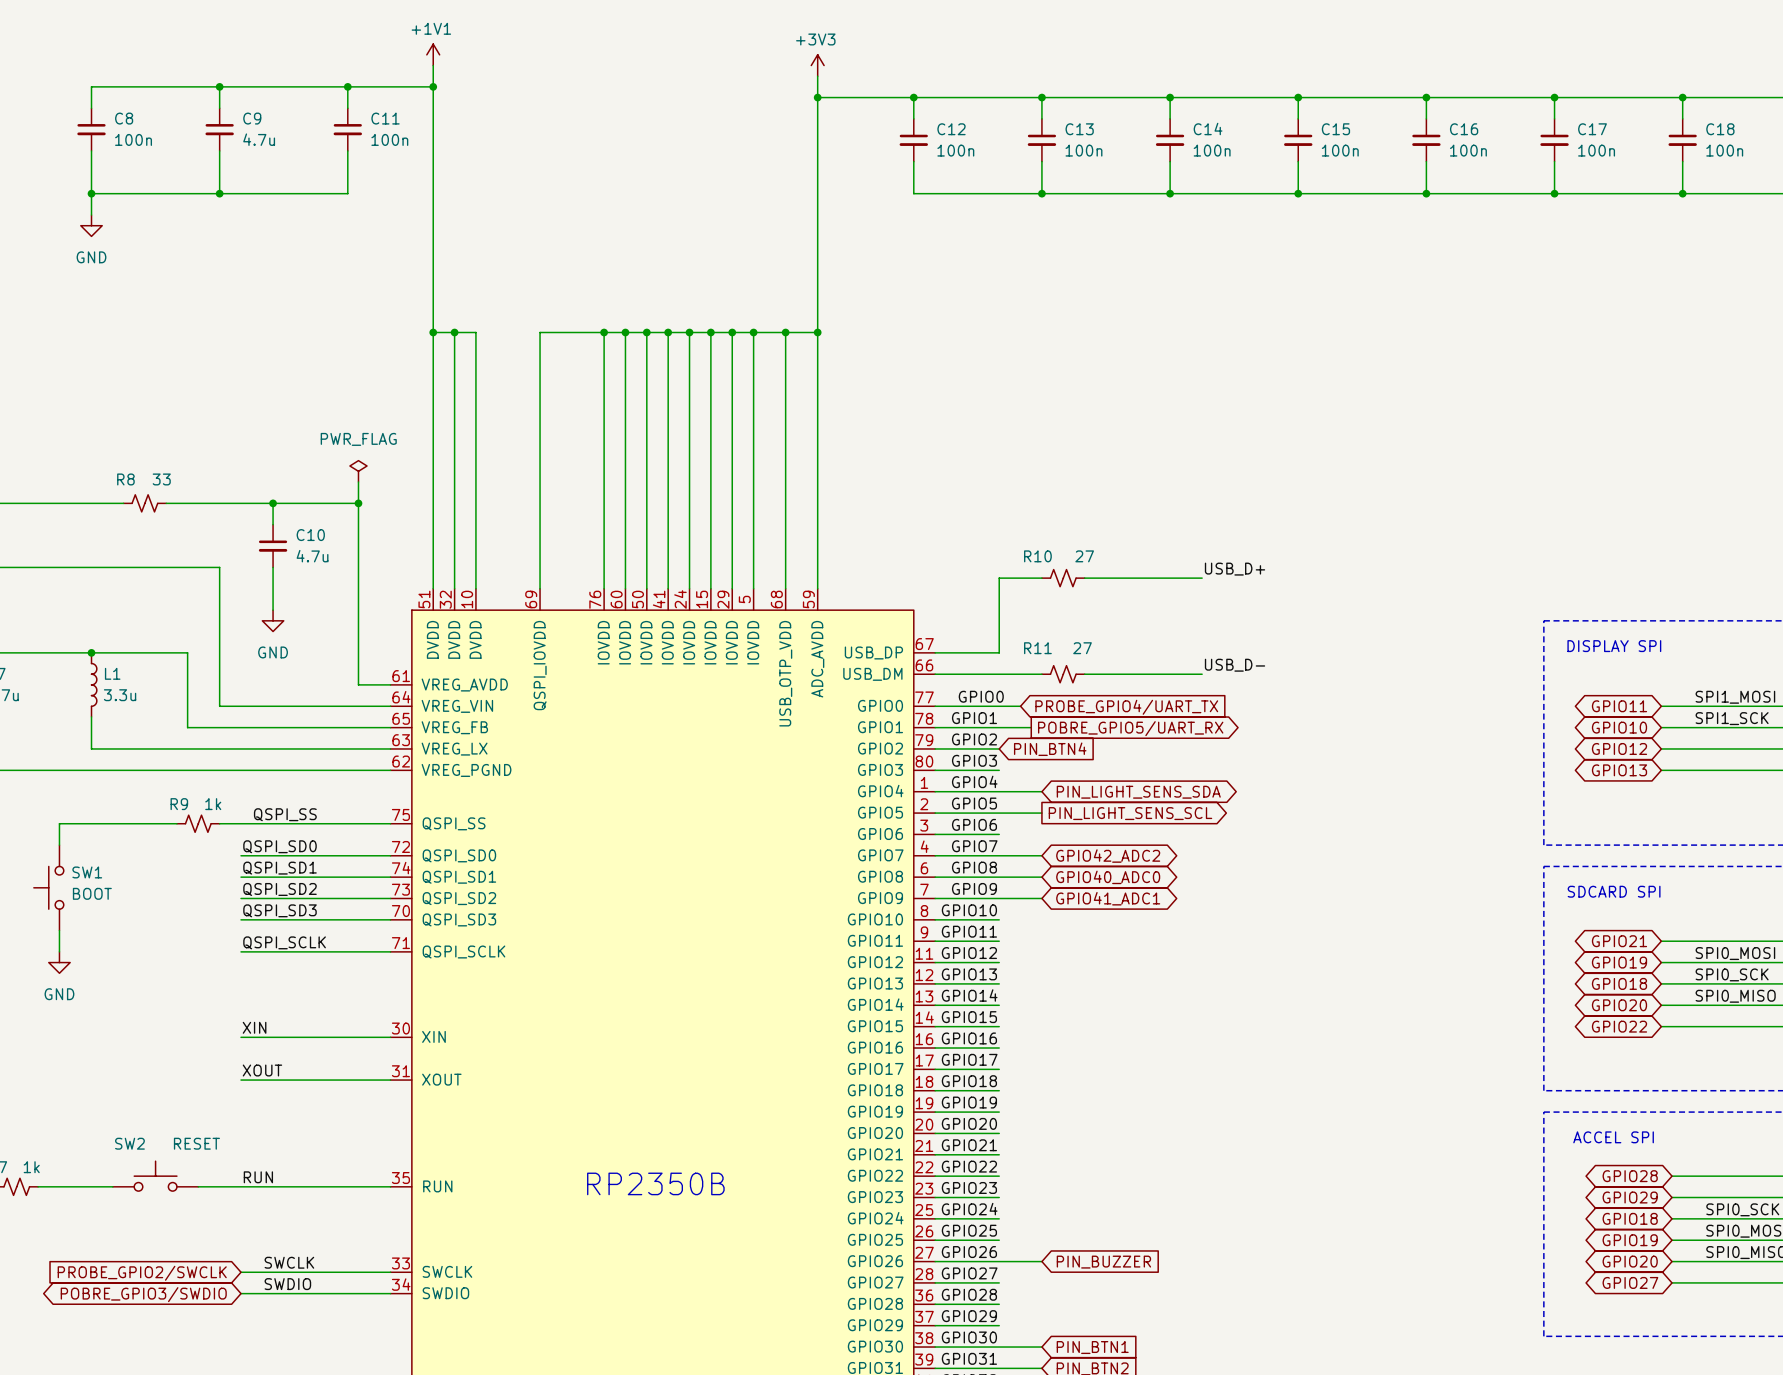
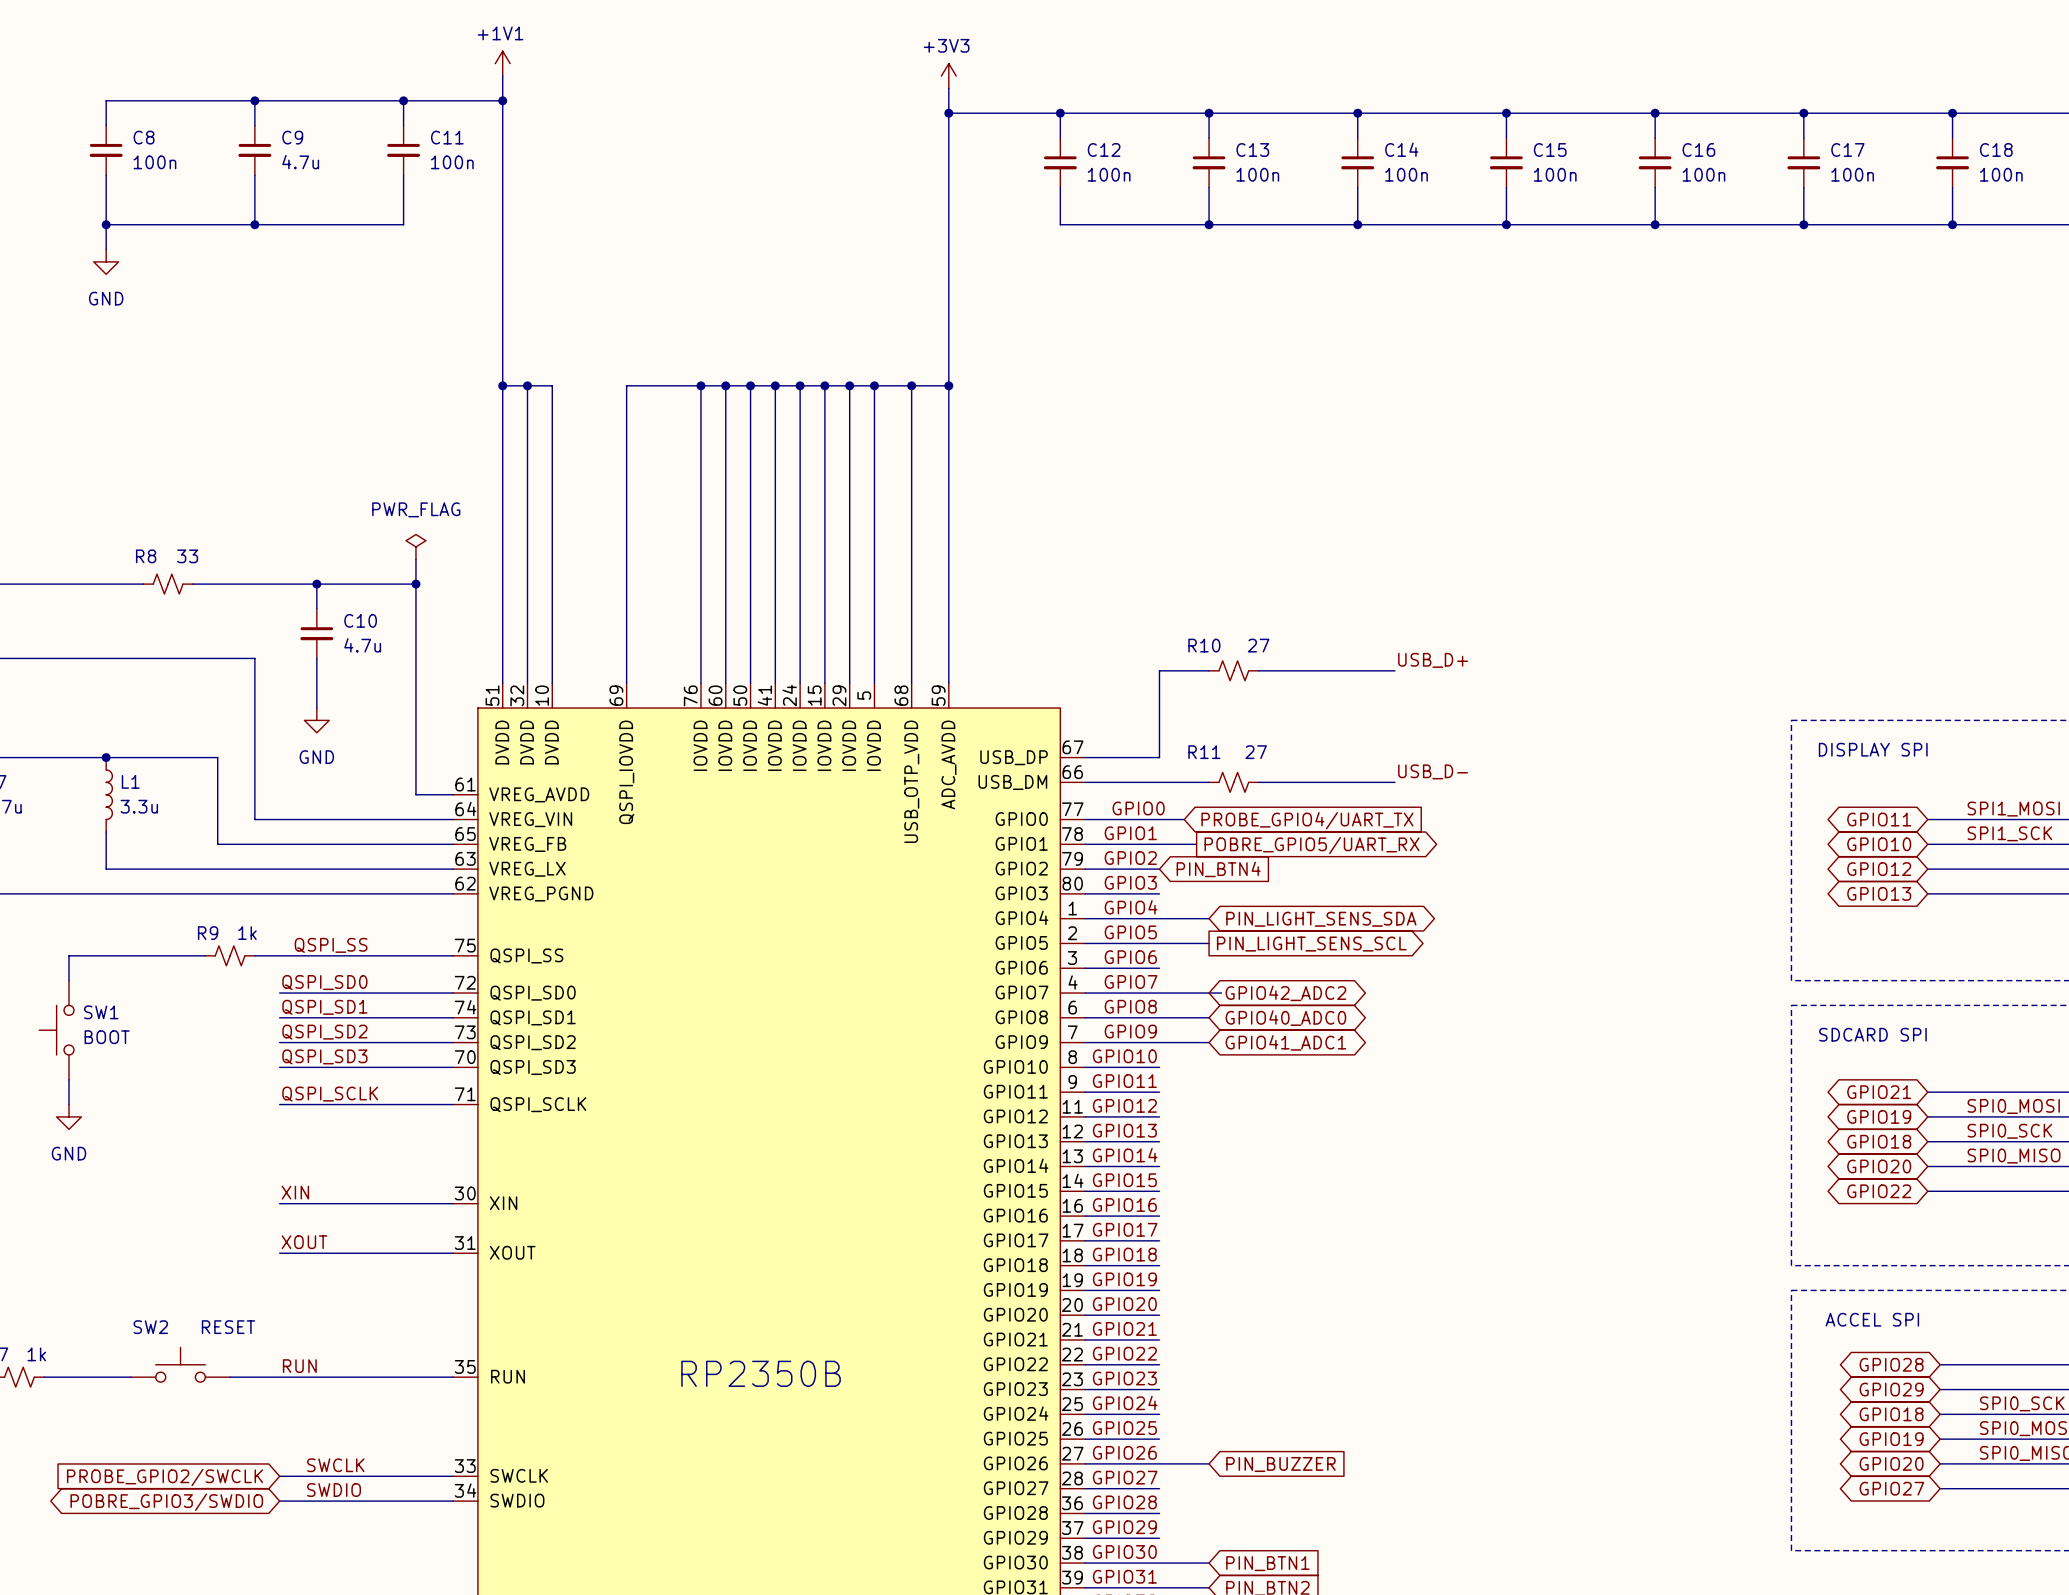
wire: none -> (1209, 993) (1221, 993)

